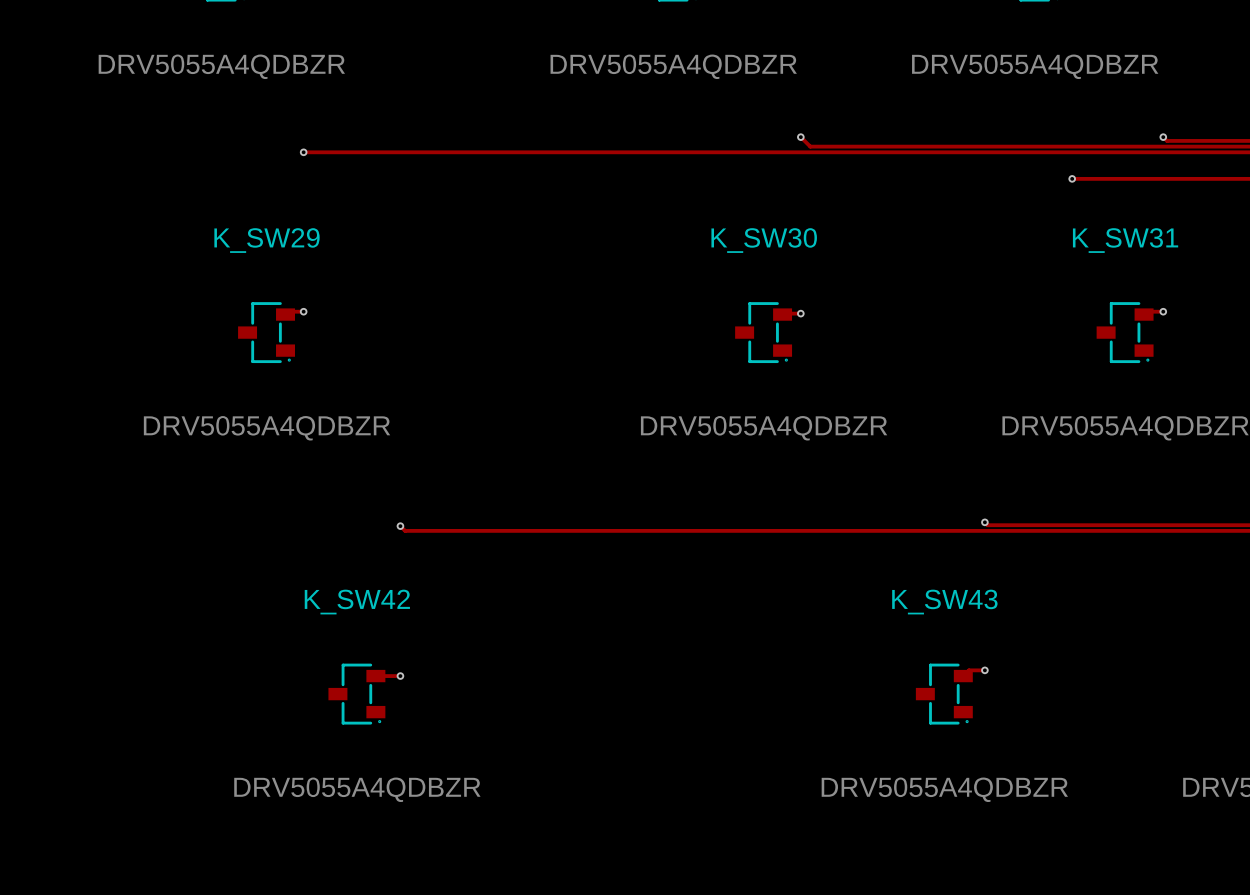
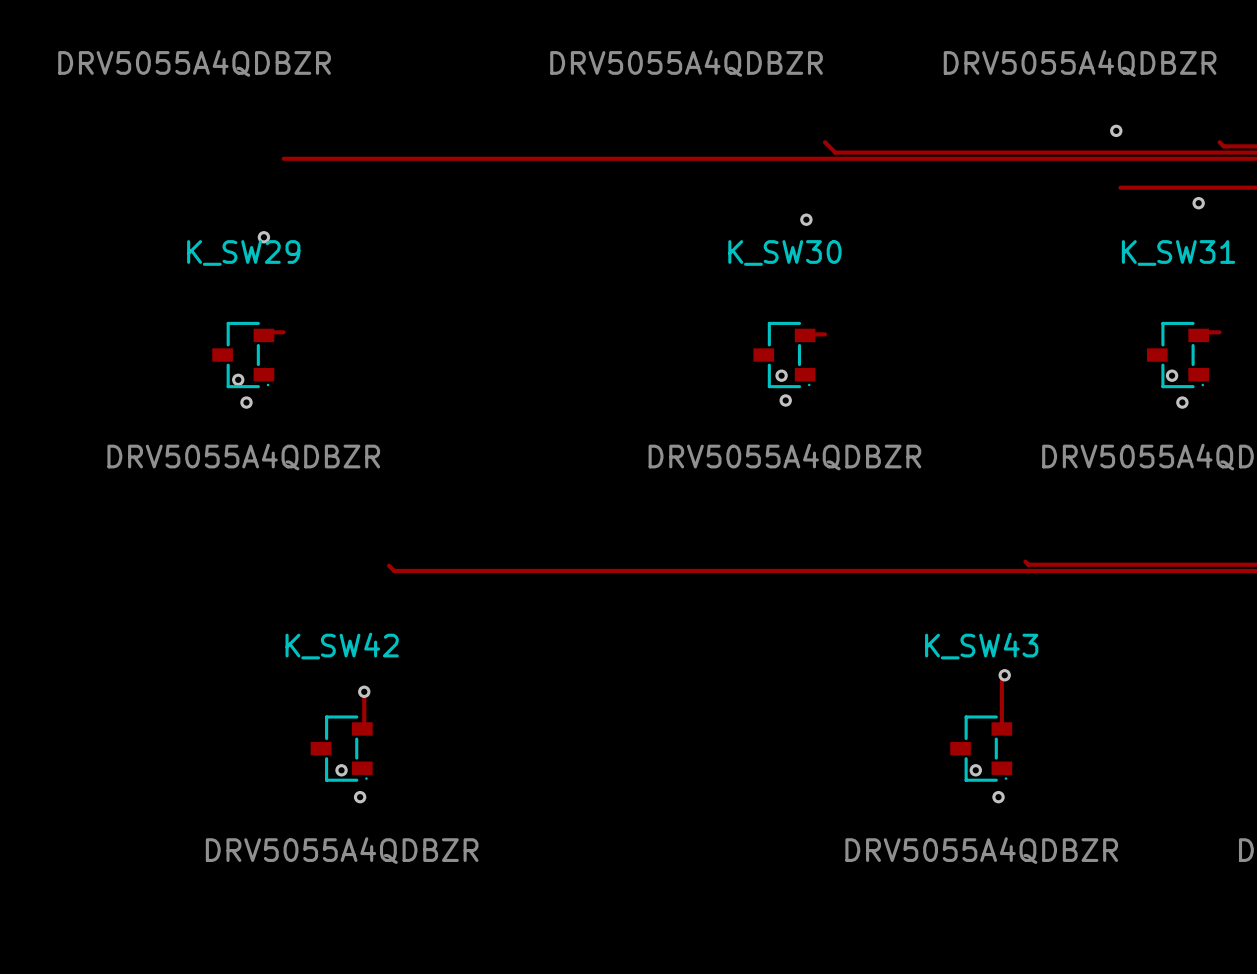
via: none -> (1116, 130)
via: (800, 137) -> none
via: (1163, 137) -> none
via: (303, 152) -> none
via: (1072, 178) -> none
via: none -> (1198, 203)
via: none -> (806, 219)
via: none -> (263, 237)
via: (303, 311) -> none
via: (1163, 311) -> none
via: (800, 313) -> none
via: none -> (781, 375)
via: none -> (1172, 375)
via: none -> (238, 379)
via: none -> (785, 400)
via: none -> (246, 402)
via: none -> (1182, 402)
via: (984, 522) -> none
via: (400, 526) -> none
via: none -> (1004, 675)
via: none -> (364, 691)
track: (984, 670) (969, 670) (963, 676) -> (1004, 675) (1001, 680) (1001, 728)
via: (984, 670) -> none
track: (375, 676) (400, 676) -> (362, 728) (364, 727) (364, 691)
via: (400, 676) -> none
via: none -> (341, 770)
via: none -> (975, 770)
via: none -> (360, 797)
via: none -> (998, 797)

